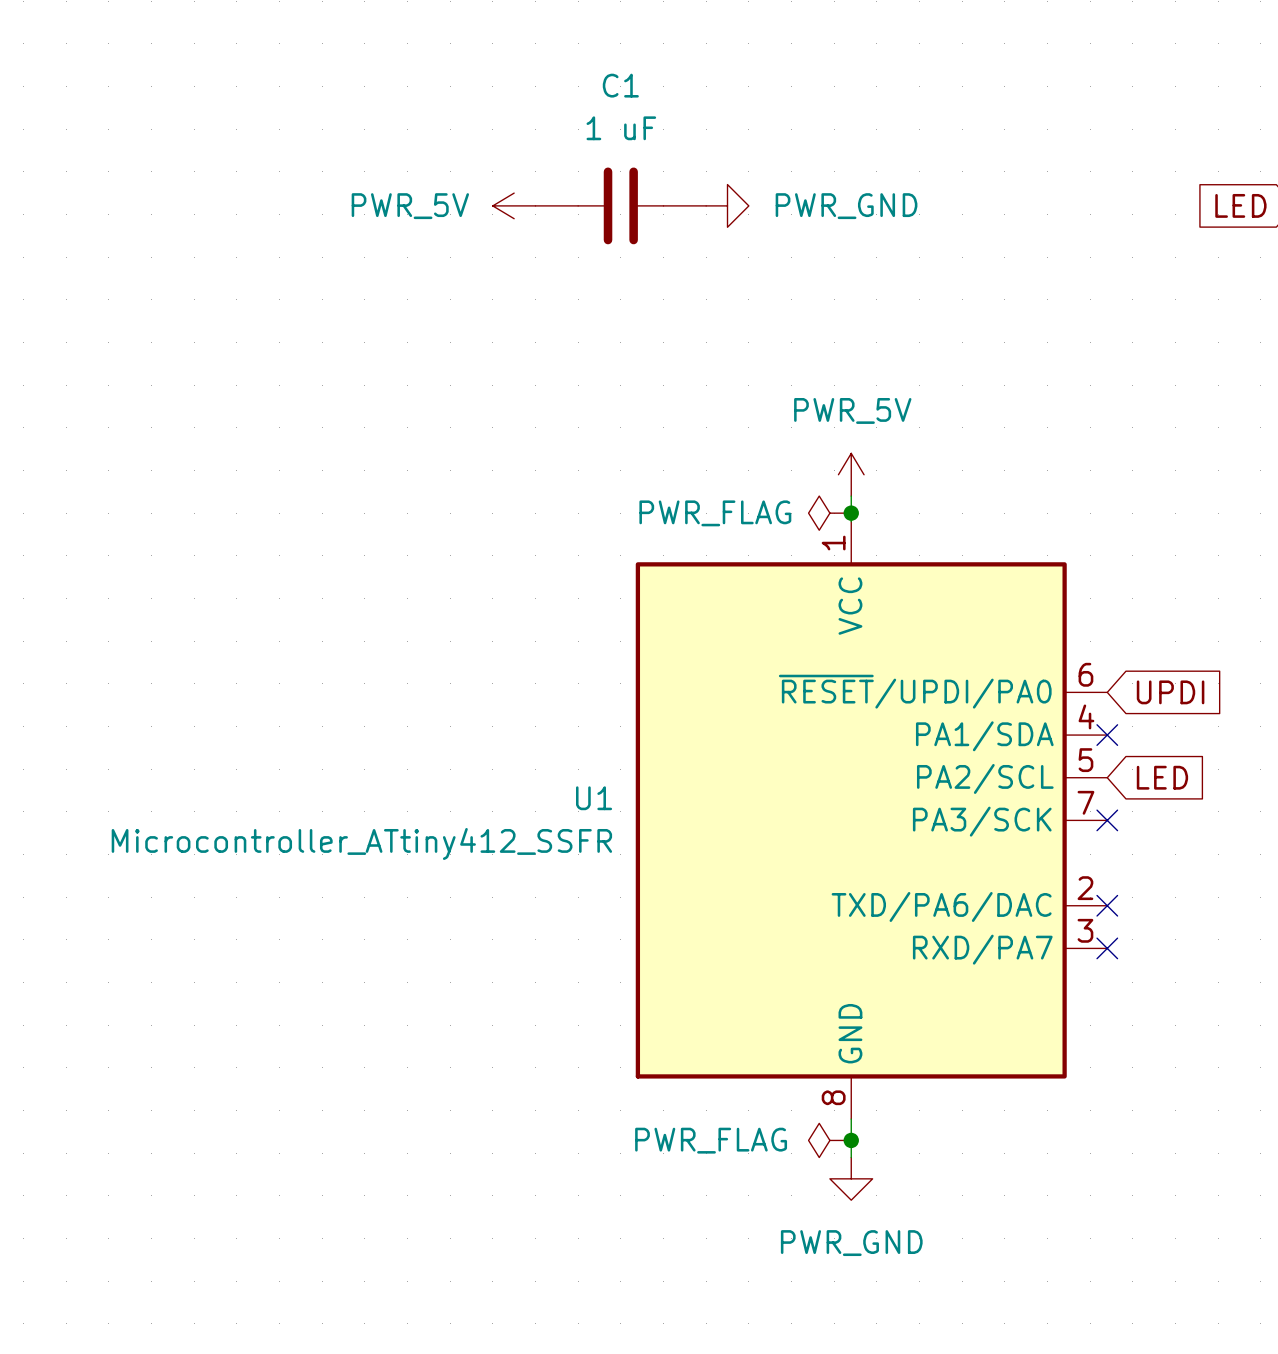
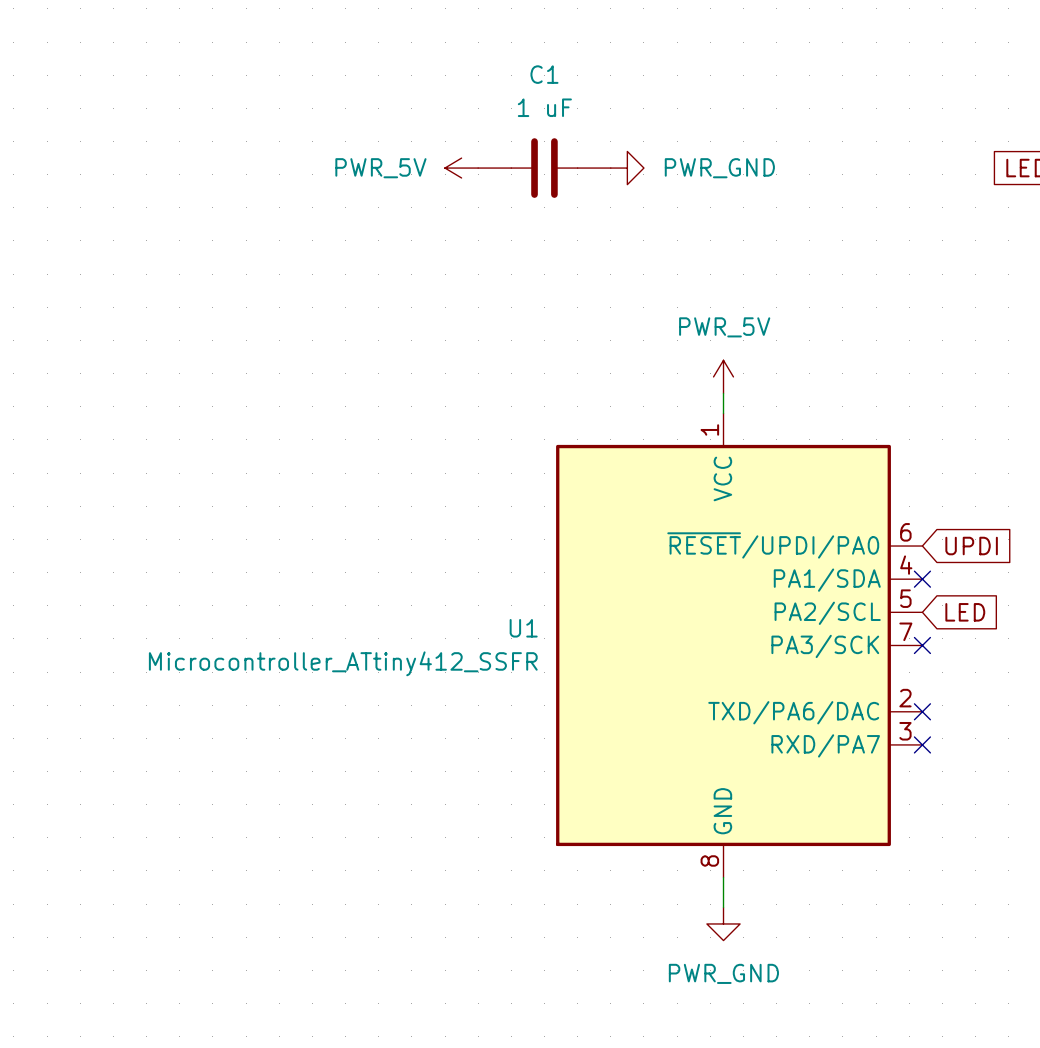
power symbol: PWR_FLAG (829, 513) -> none
junction: (851, 513) -> none
power symbol: PWR_FLAG (829, 1140) -> none
junction: (851, 1140) -> none

